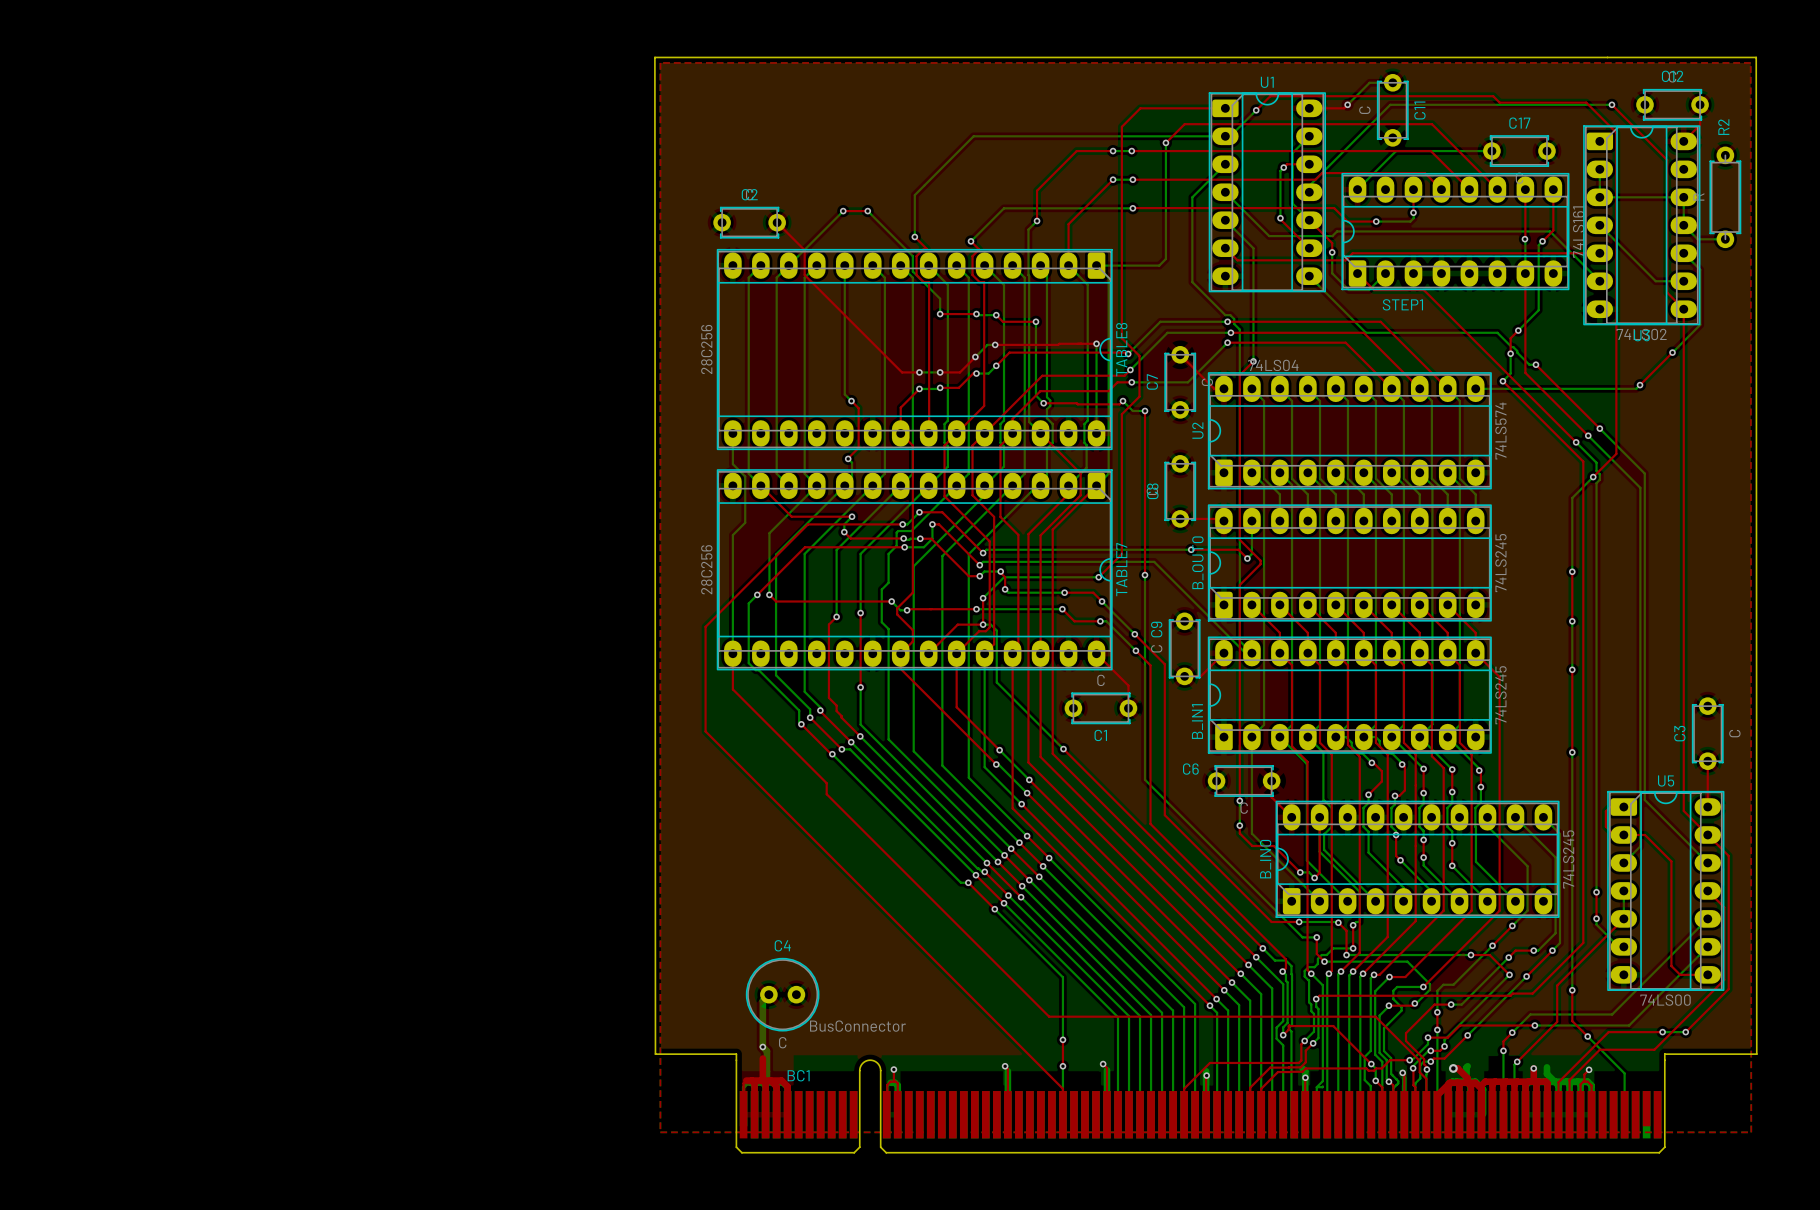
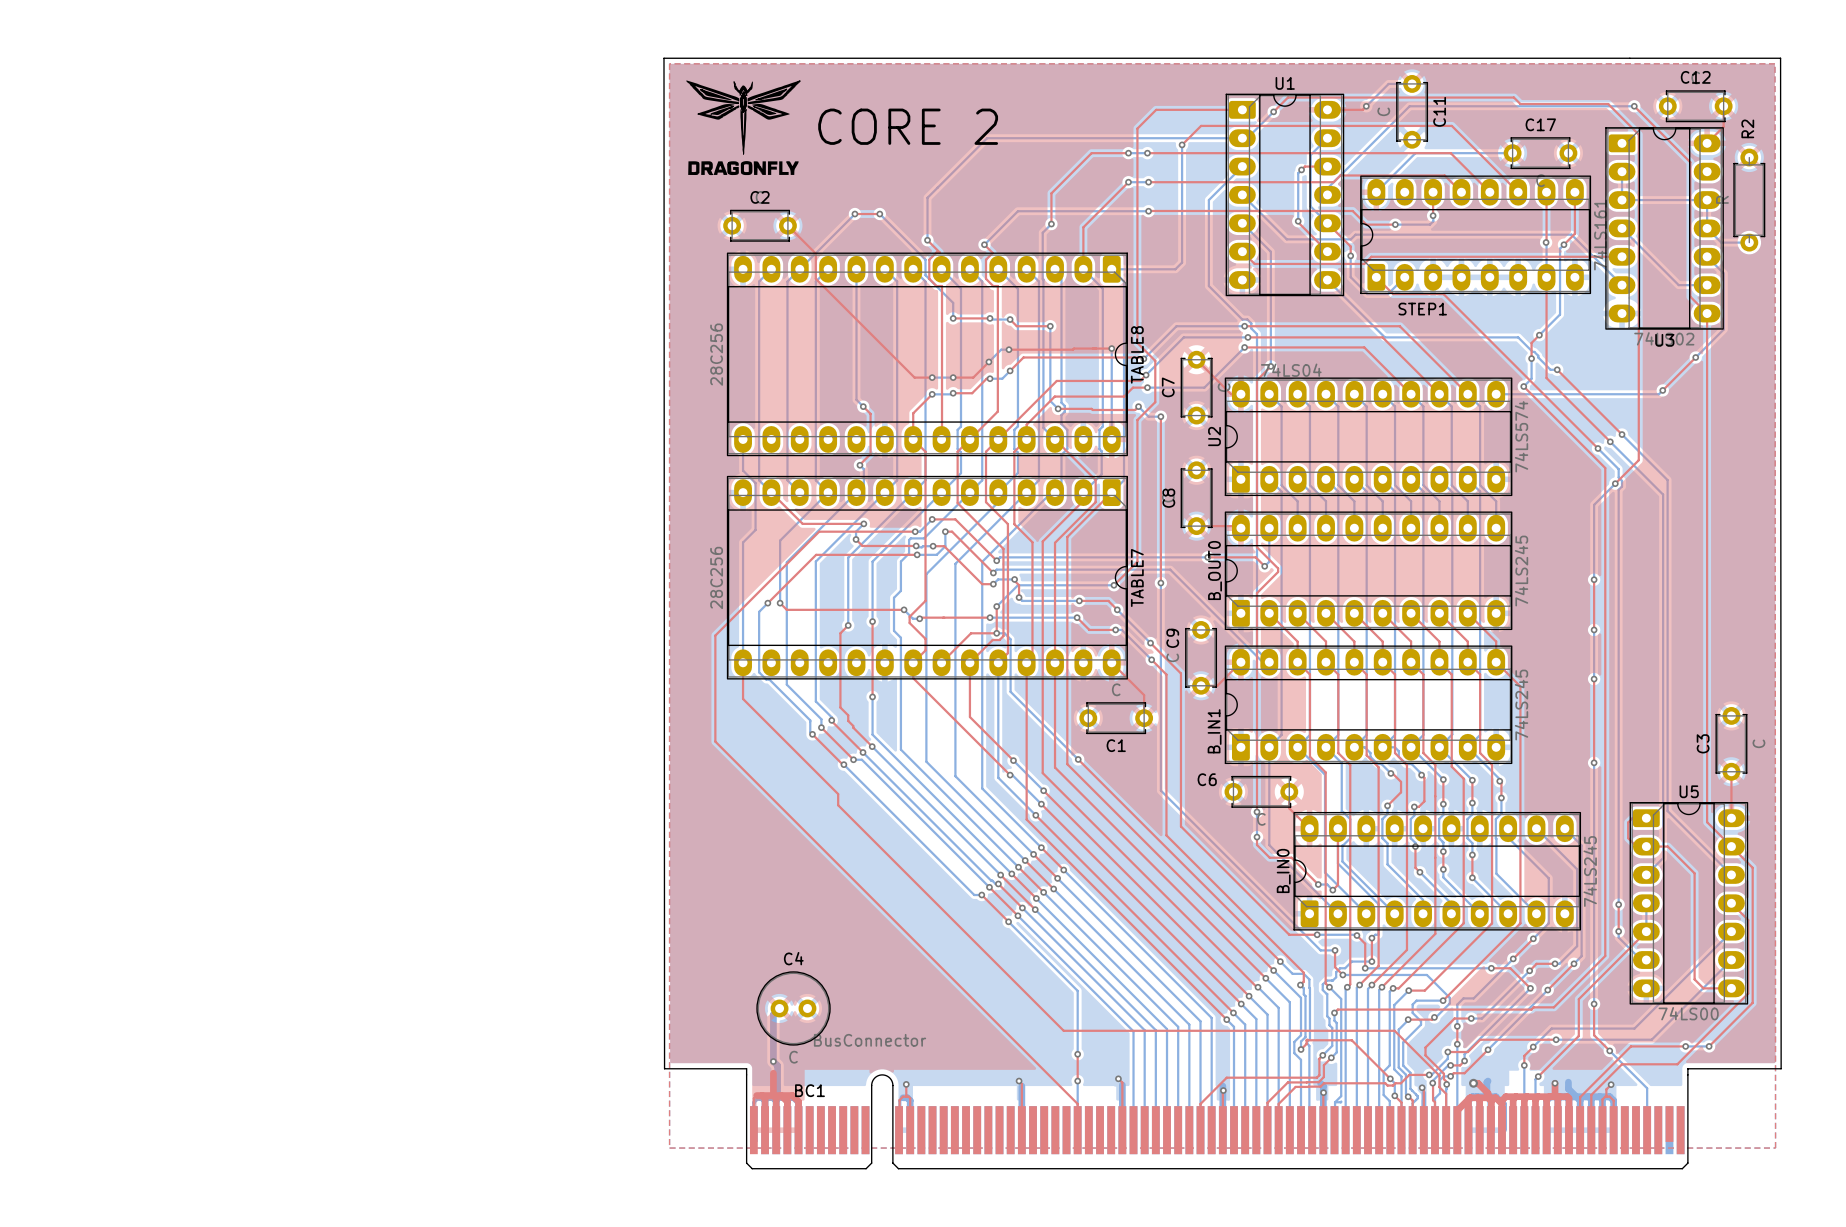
drawing: none -> [686, 80, 801, 176]
text: none -> CORE 2 (908, 126)

